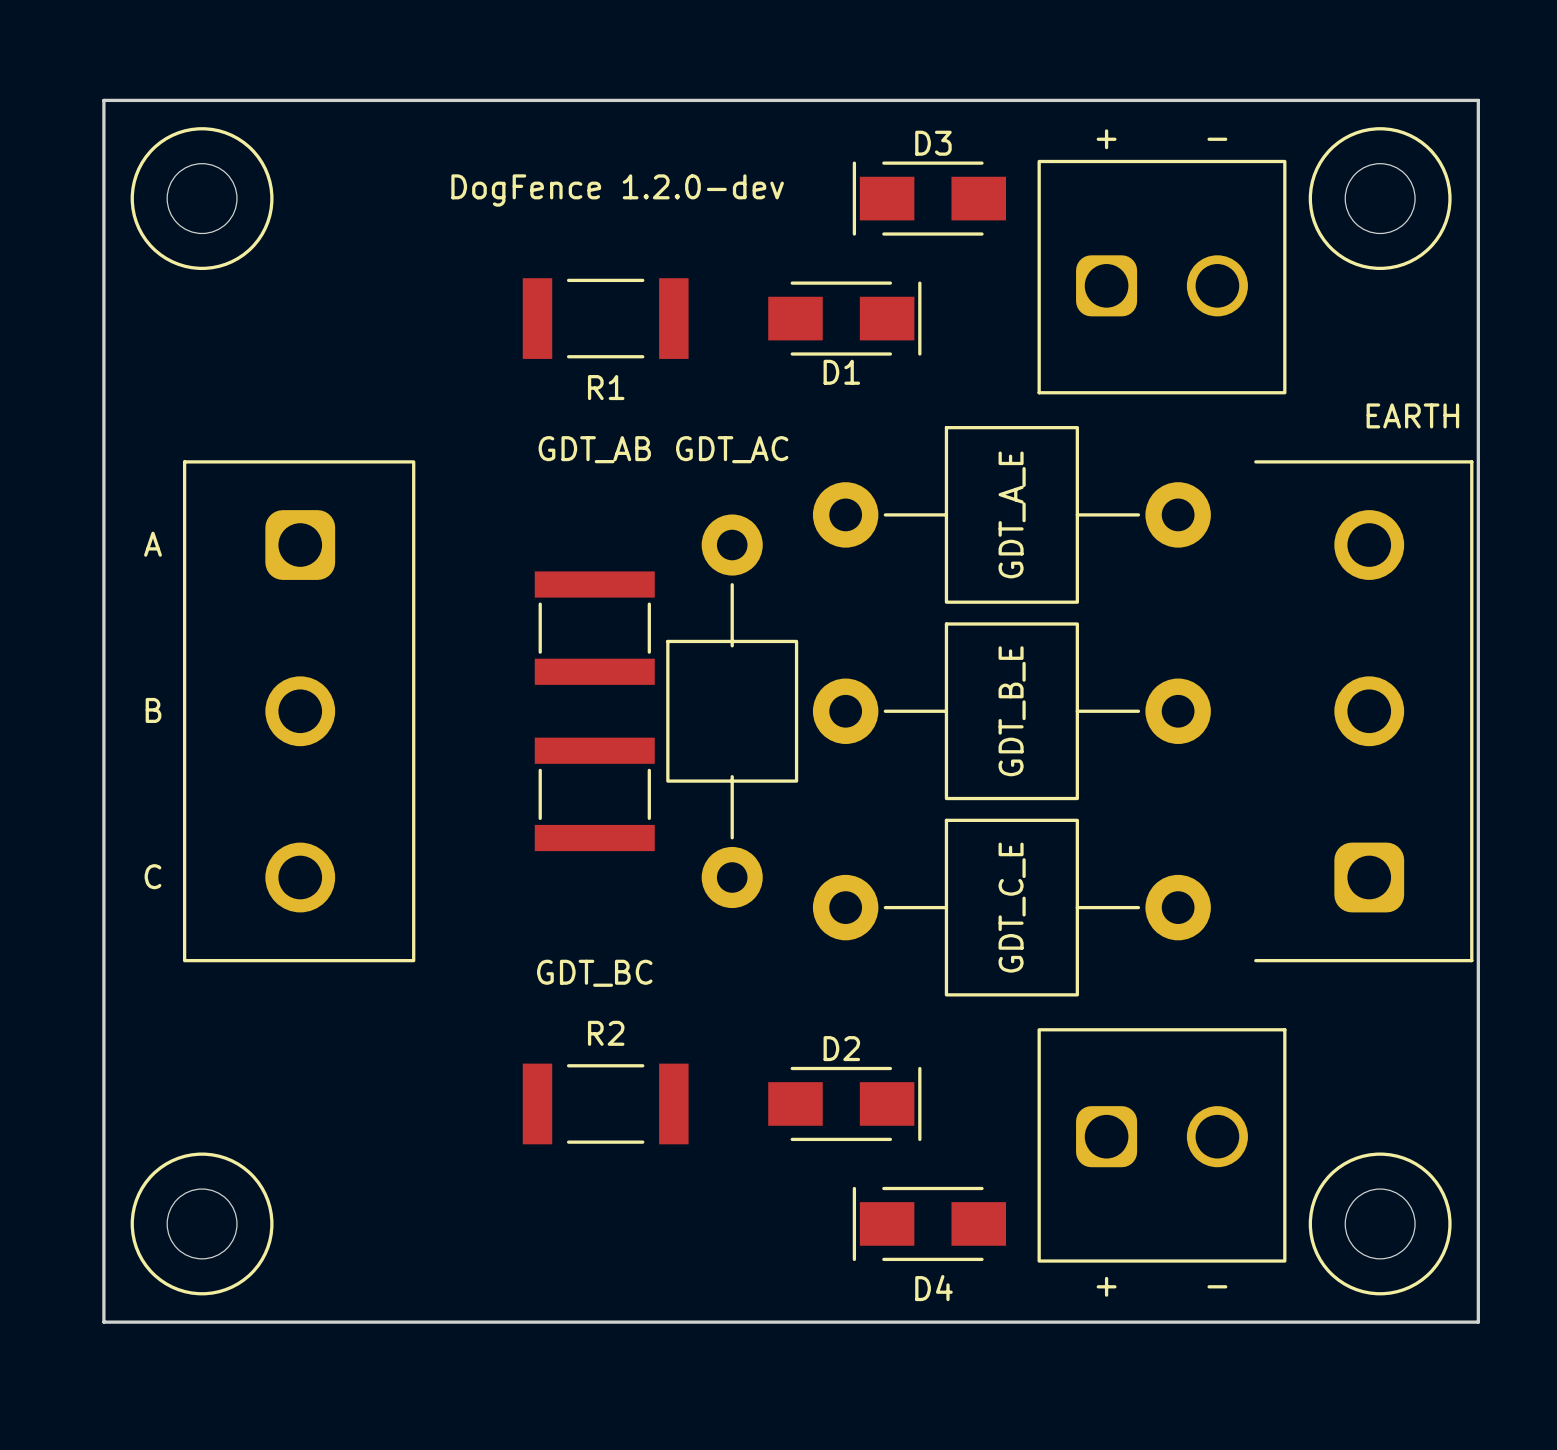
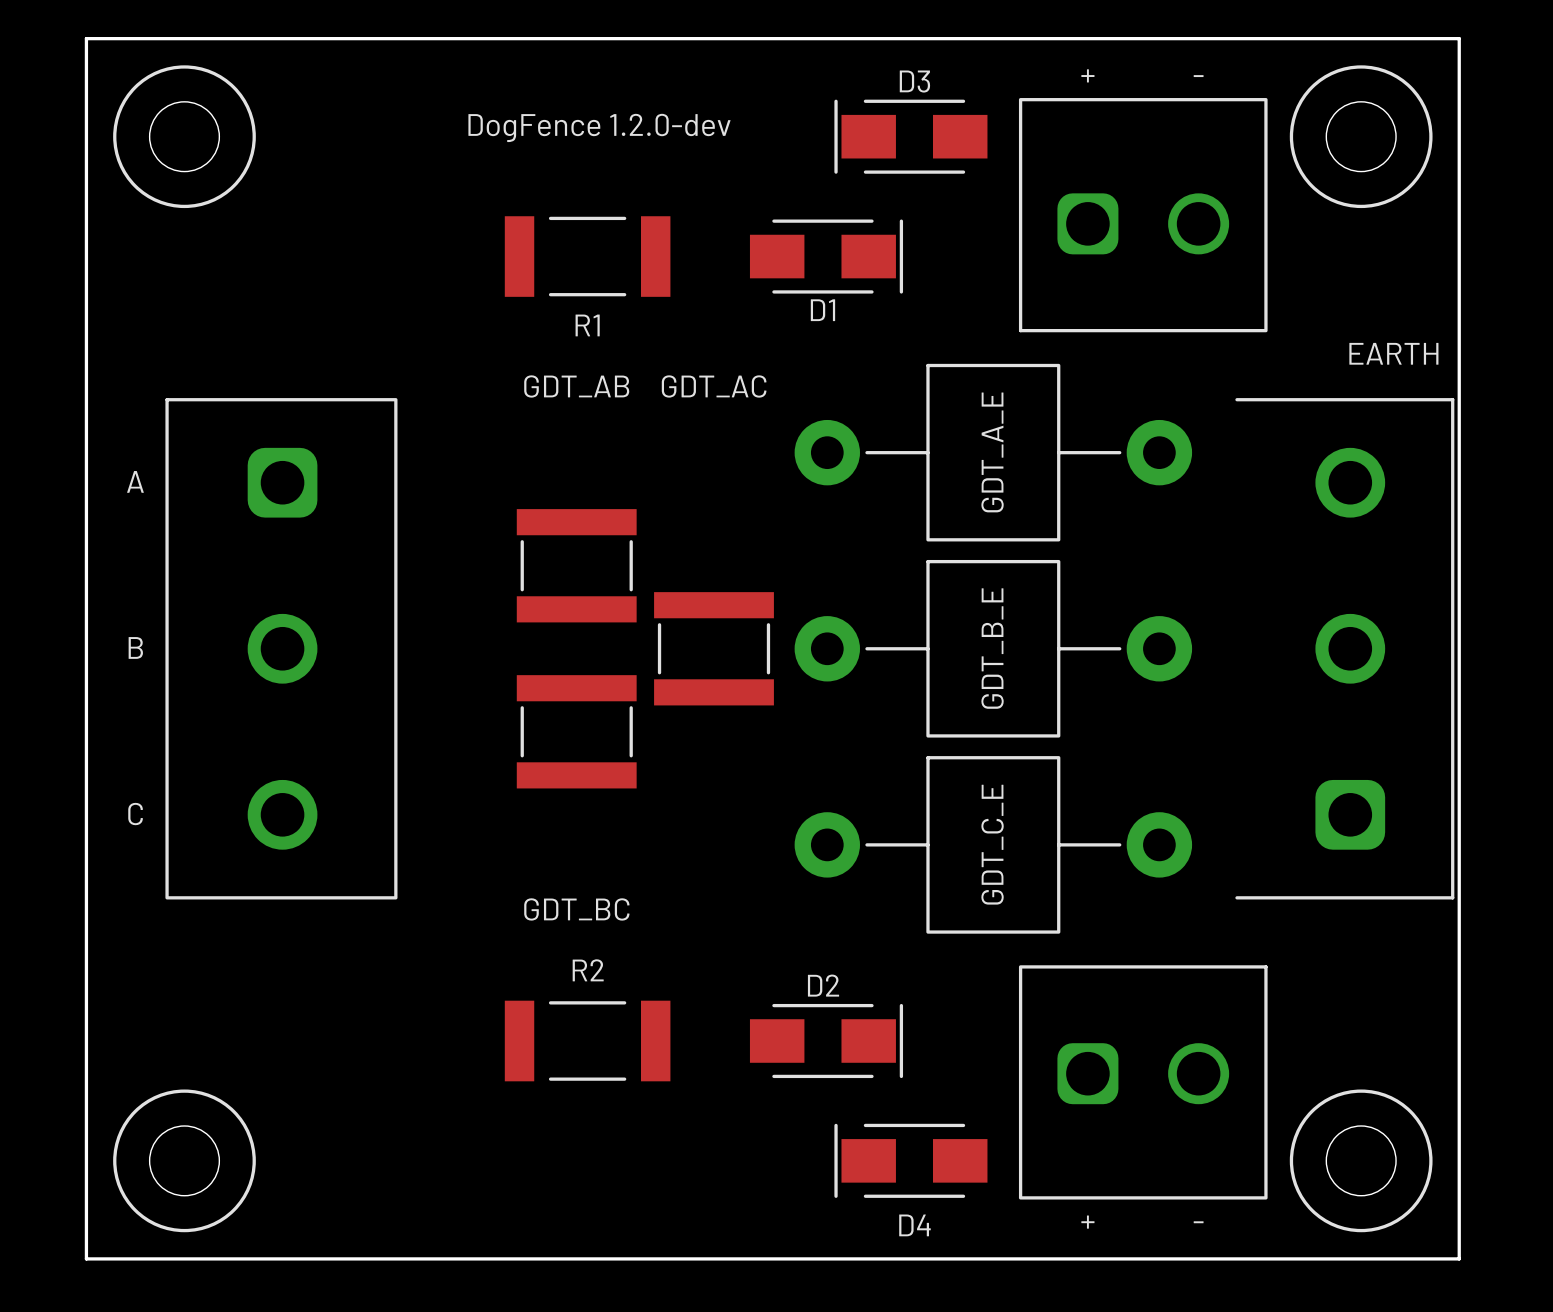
GDT_AC footprint: [666, 514, 799, 909] -> [654, 592, 774, 706]

